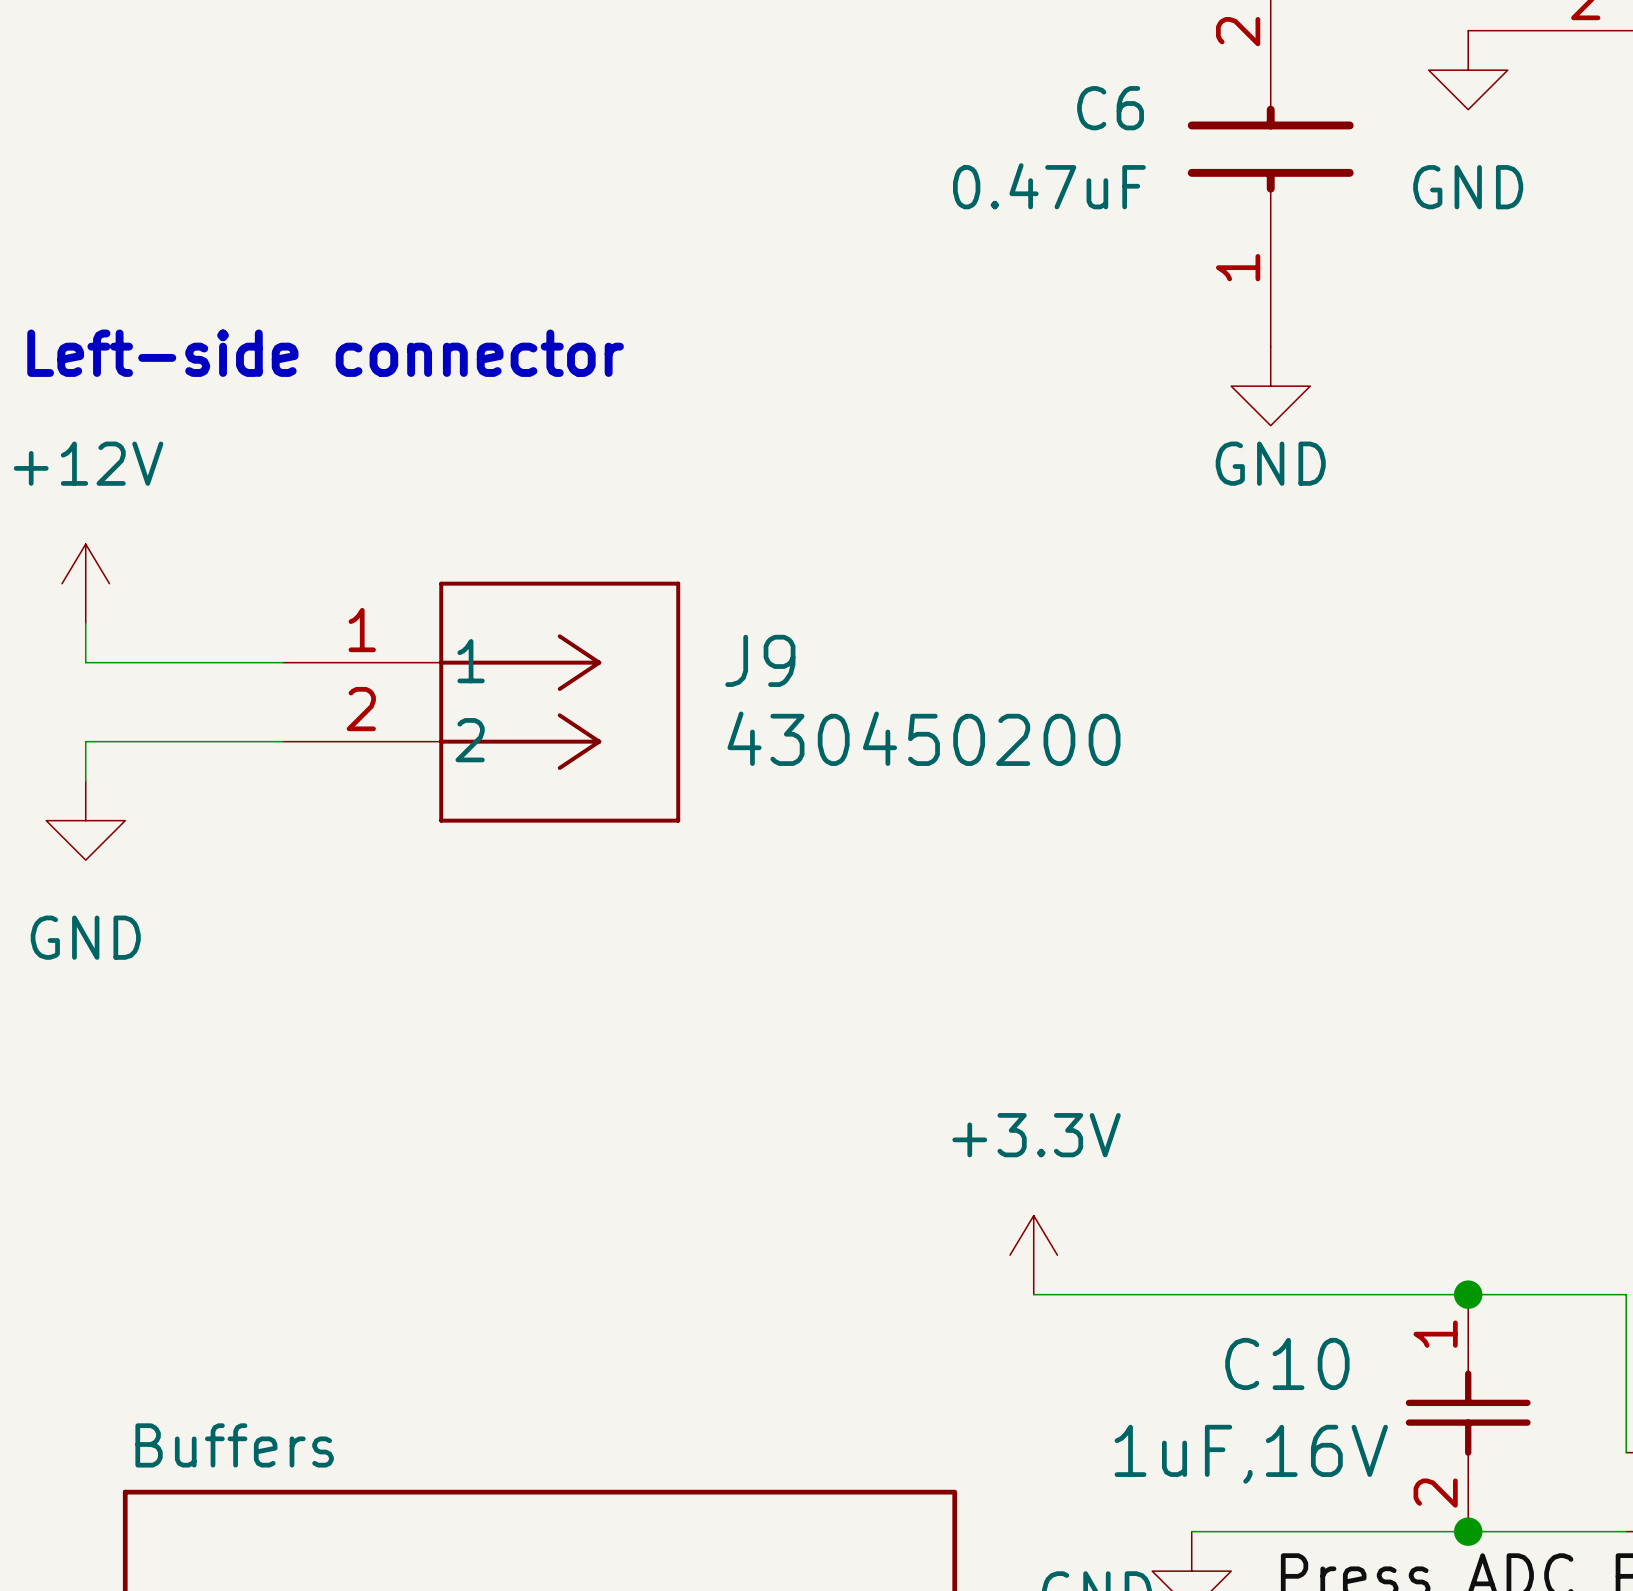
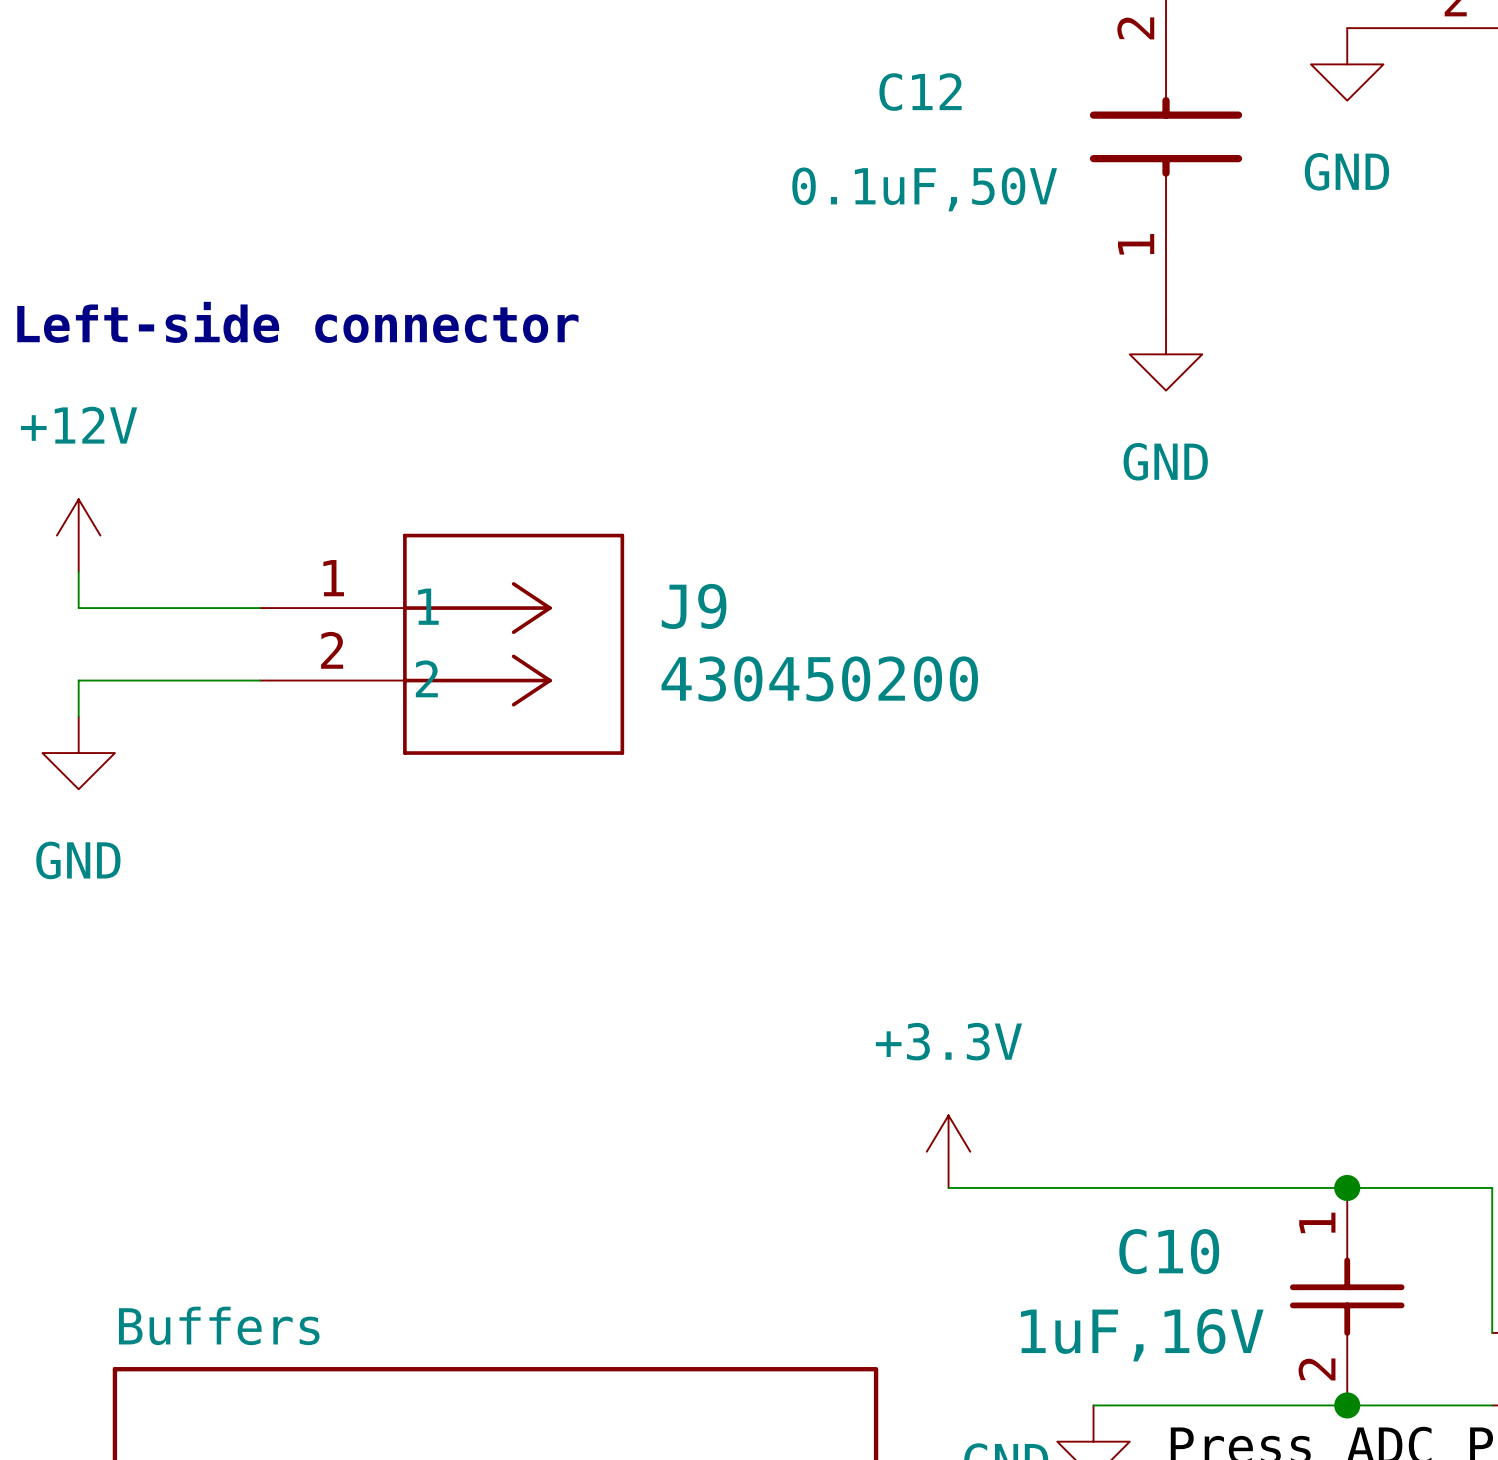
C6 name: C6 (1110, 108) -> C12 (920, 92)
C6 value: 0.47uF (1049, 186) -> 0.1uF,50V (924, 189)
power symbol text position: GND (1270, 463) -> GND (1165, 461)

